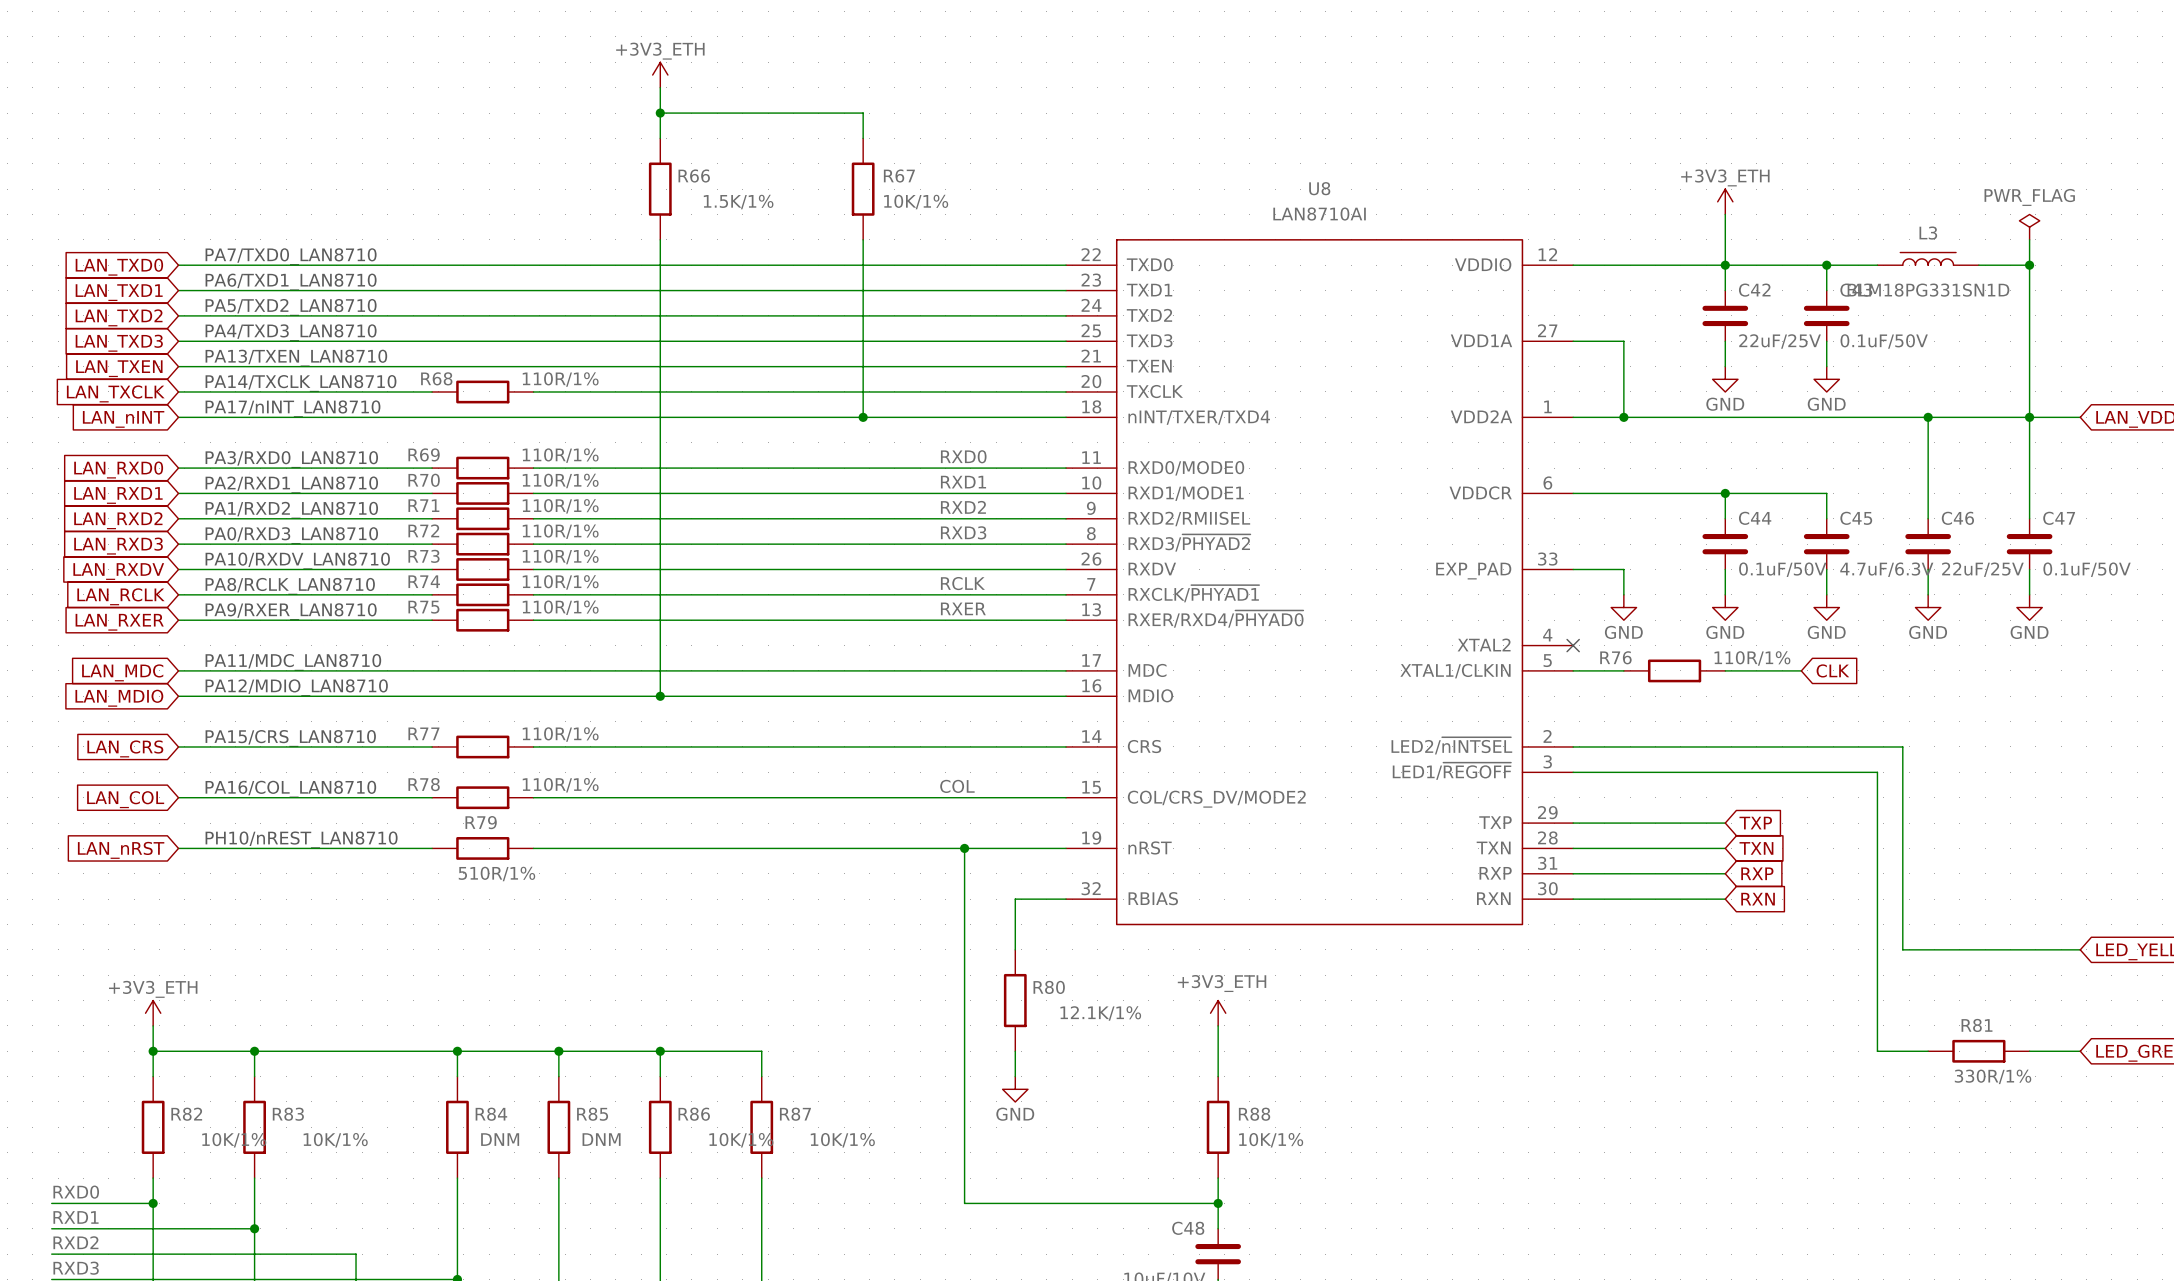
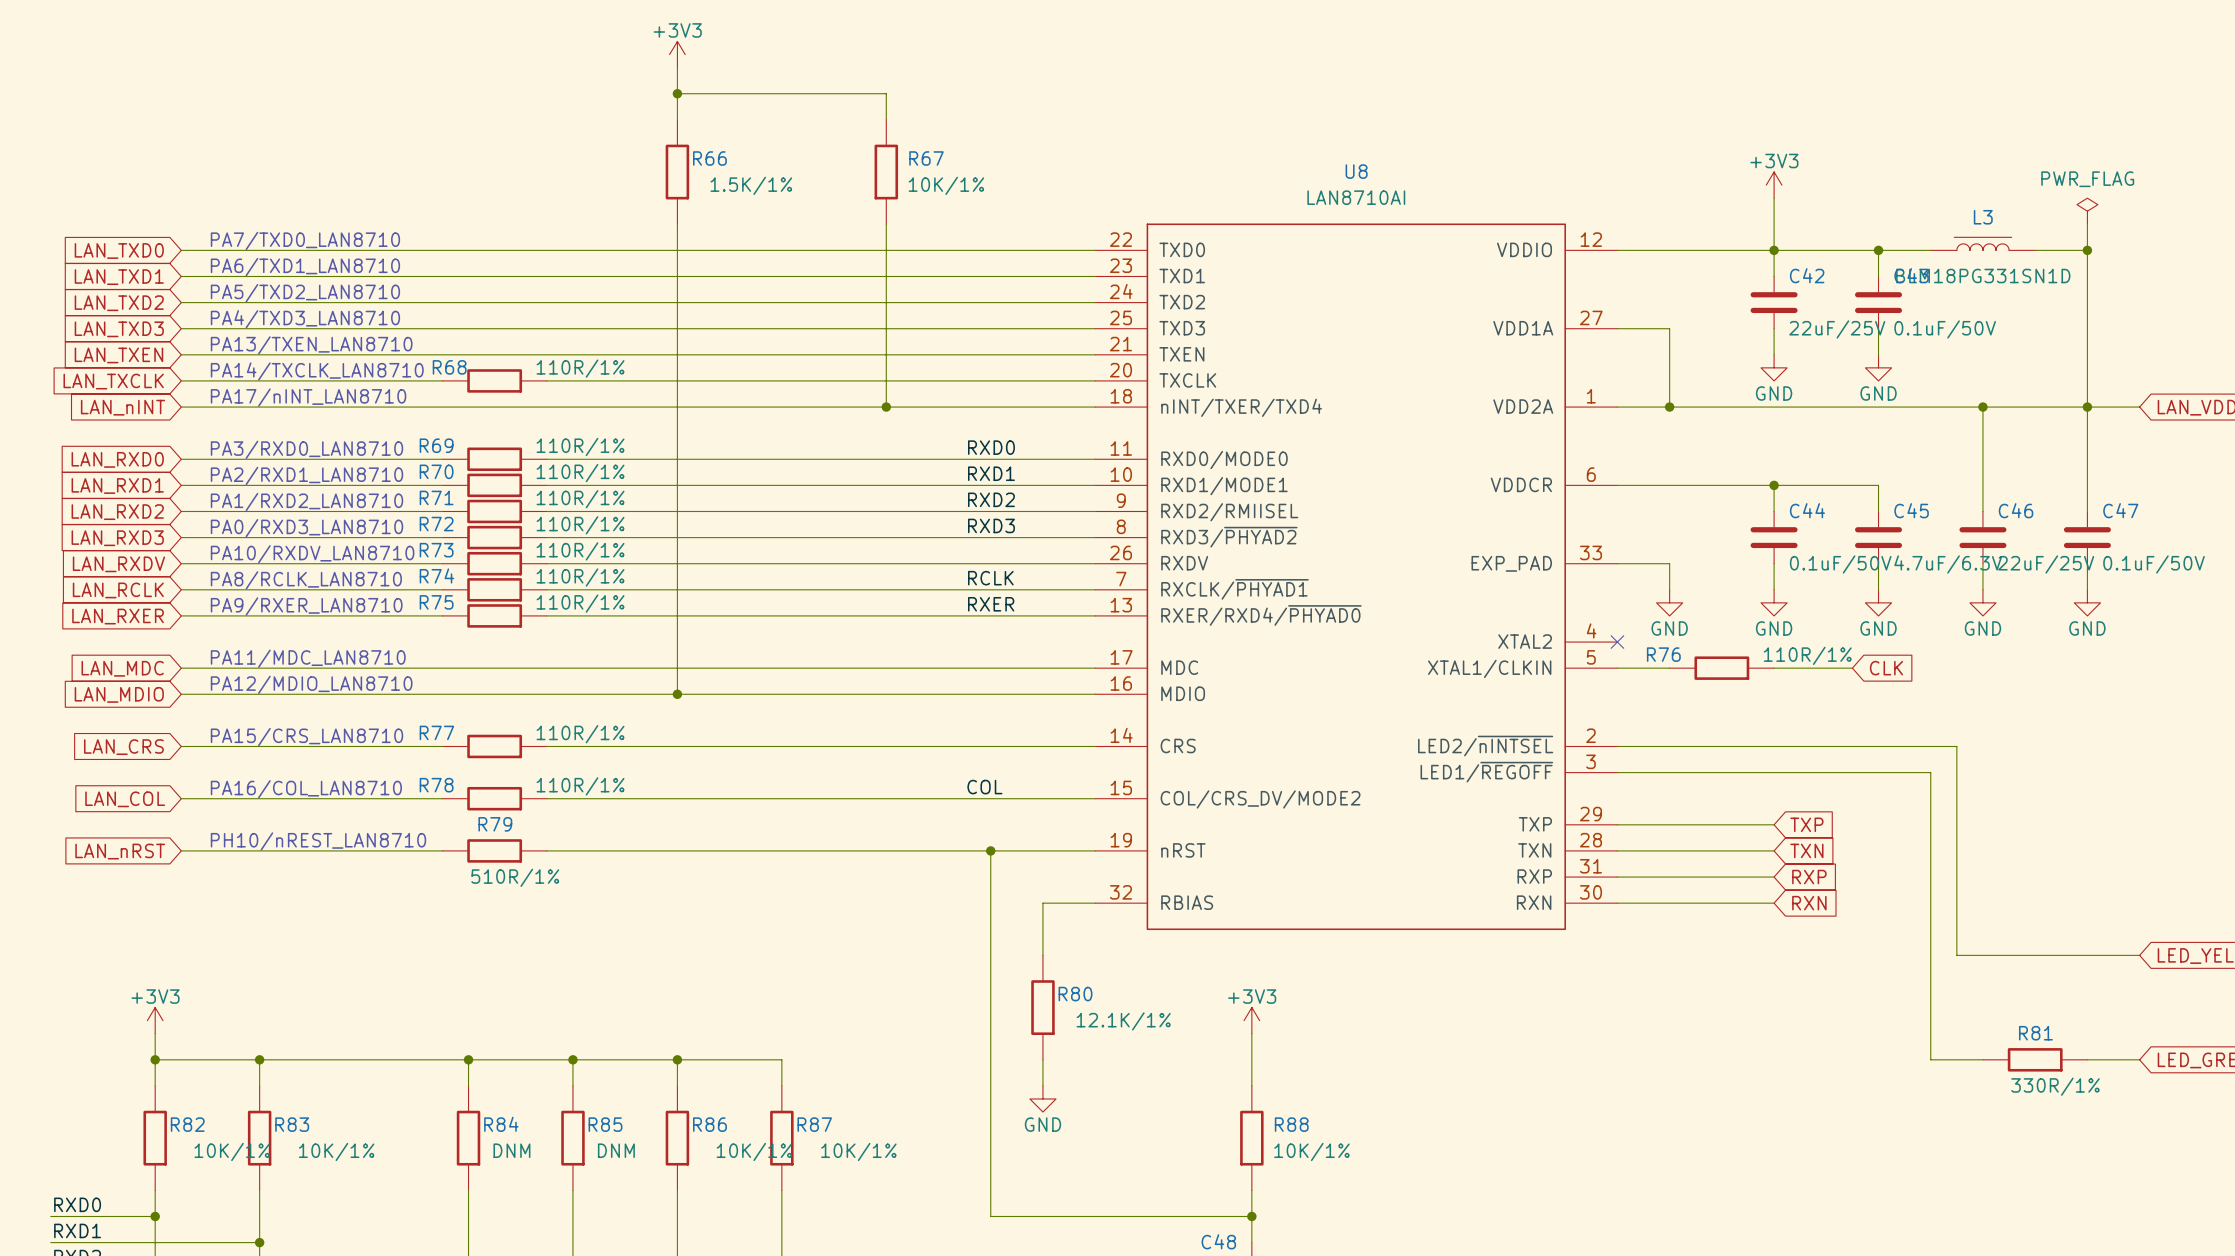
power symbol: +3V3_ETH (660, 75) -> +3V3 (677, 54)
power symbol: +3V3_ETH (1725, 201) -> +3V3 (1774, 185)
power symbol: +3V3_ETH (153, 1013) -> +3V3 (155, 1020)
power symbol: +3V3_ETH (1218, 1013) -> +3V3 (1251, 1020)

